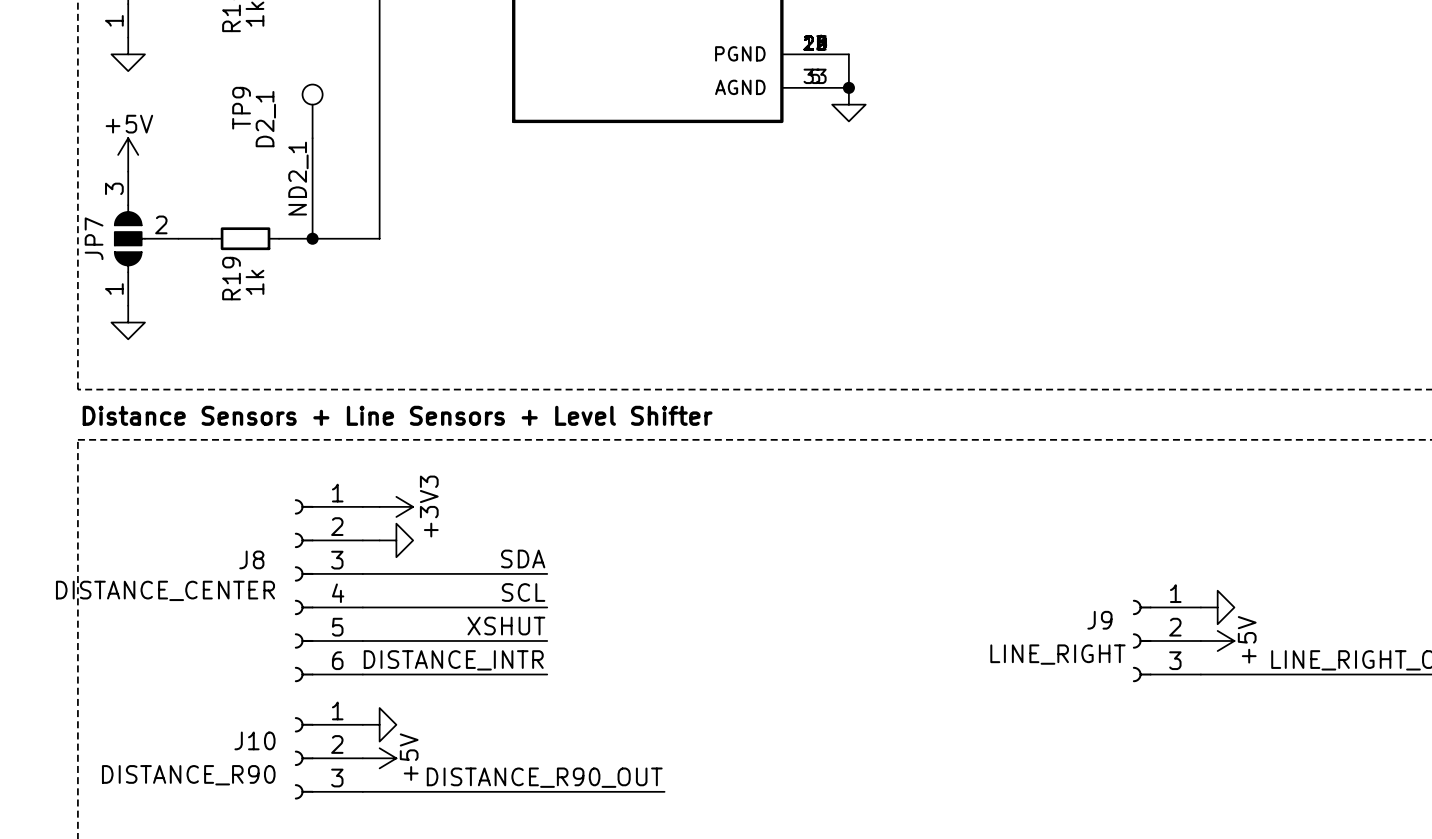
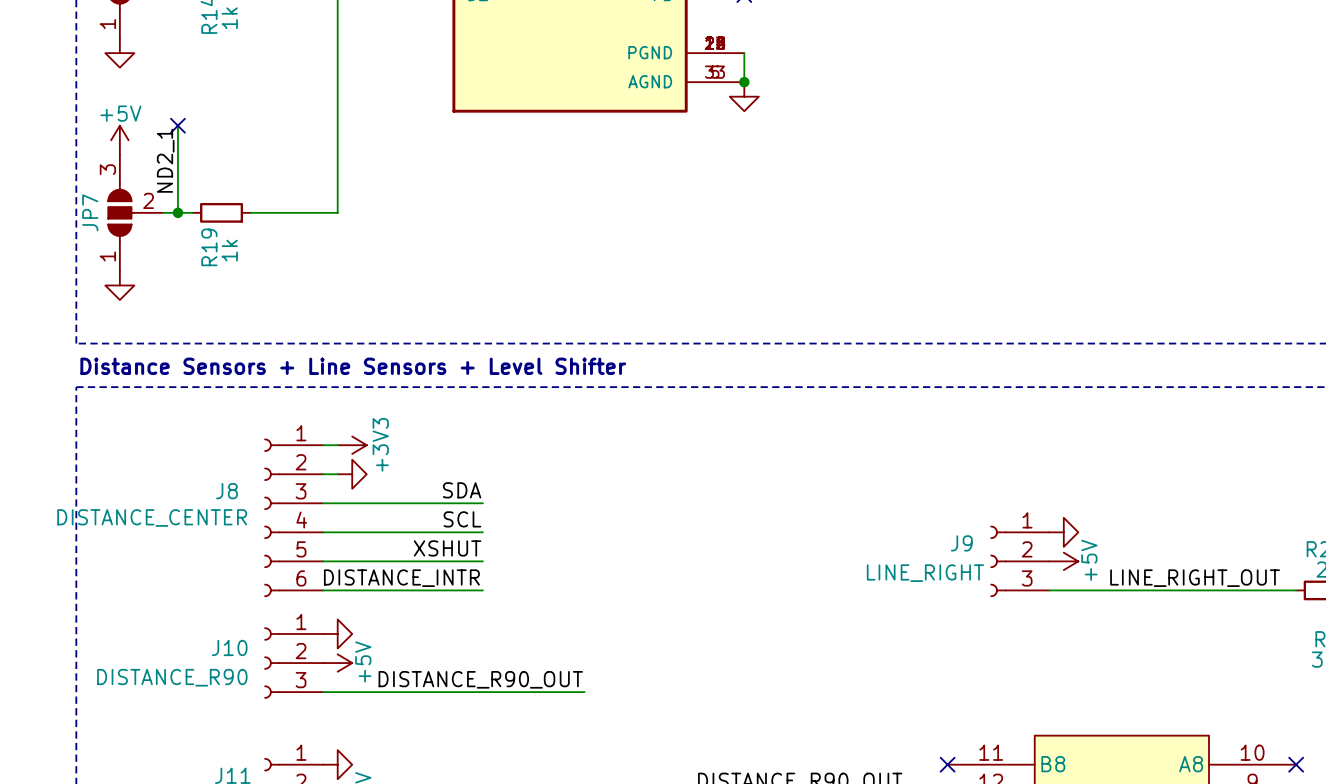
TP9: D2_1 (312, 111) -> none
no-connect mark: none -> (177, 125)
wire: (312, 138) (312, 238) -> (177, 125) (177, 212)
label position: ND2_1 (298, 178) -> ND2_1 (165, 160)
junction: none -> (177, 212)
junction: (312, 238) -> none

